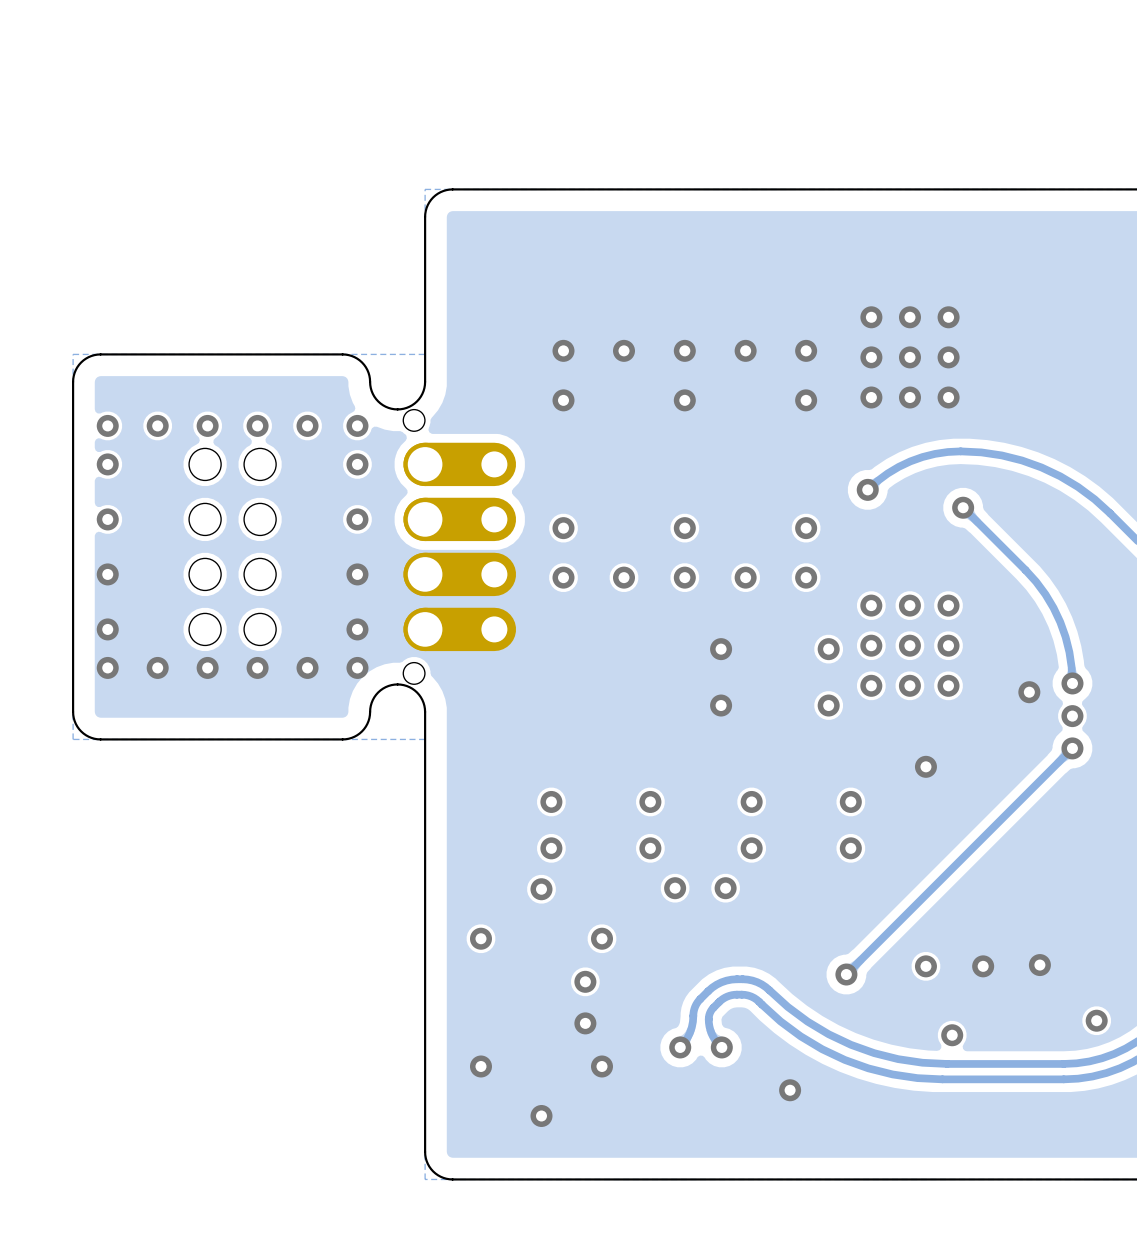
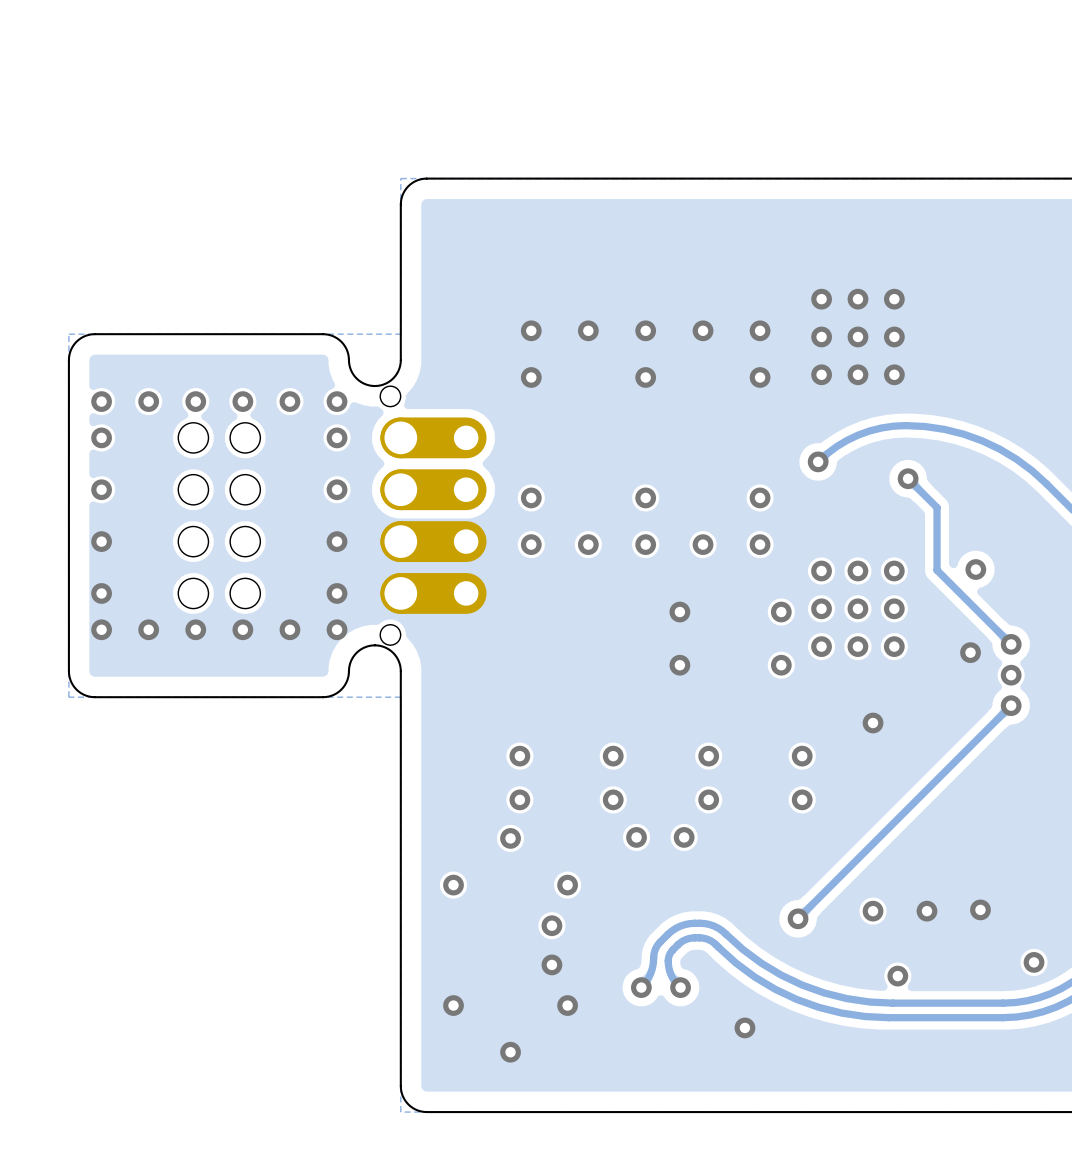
track: (993, 538) (1036, 581) (1053, 607) (1065, 636) (1069, 652) (1072, 683) -> (937, 507) (937, 570) (1011, 644)
via: none -> (975, 569)

